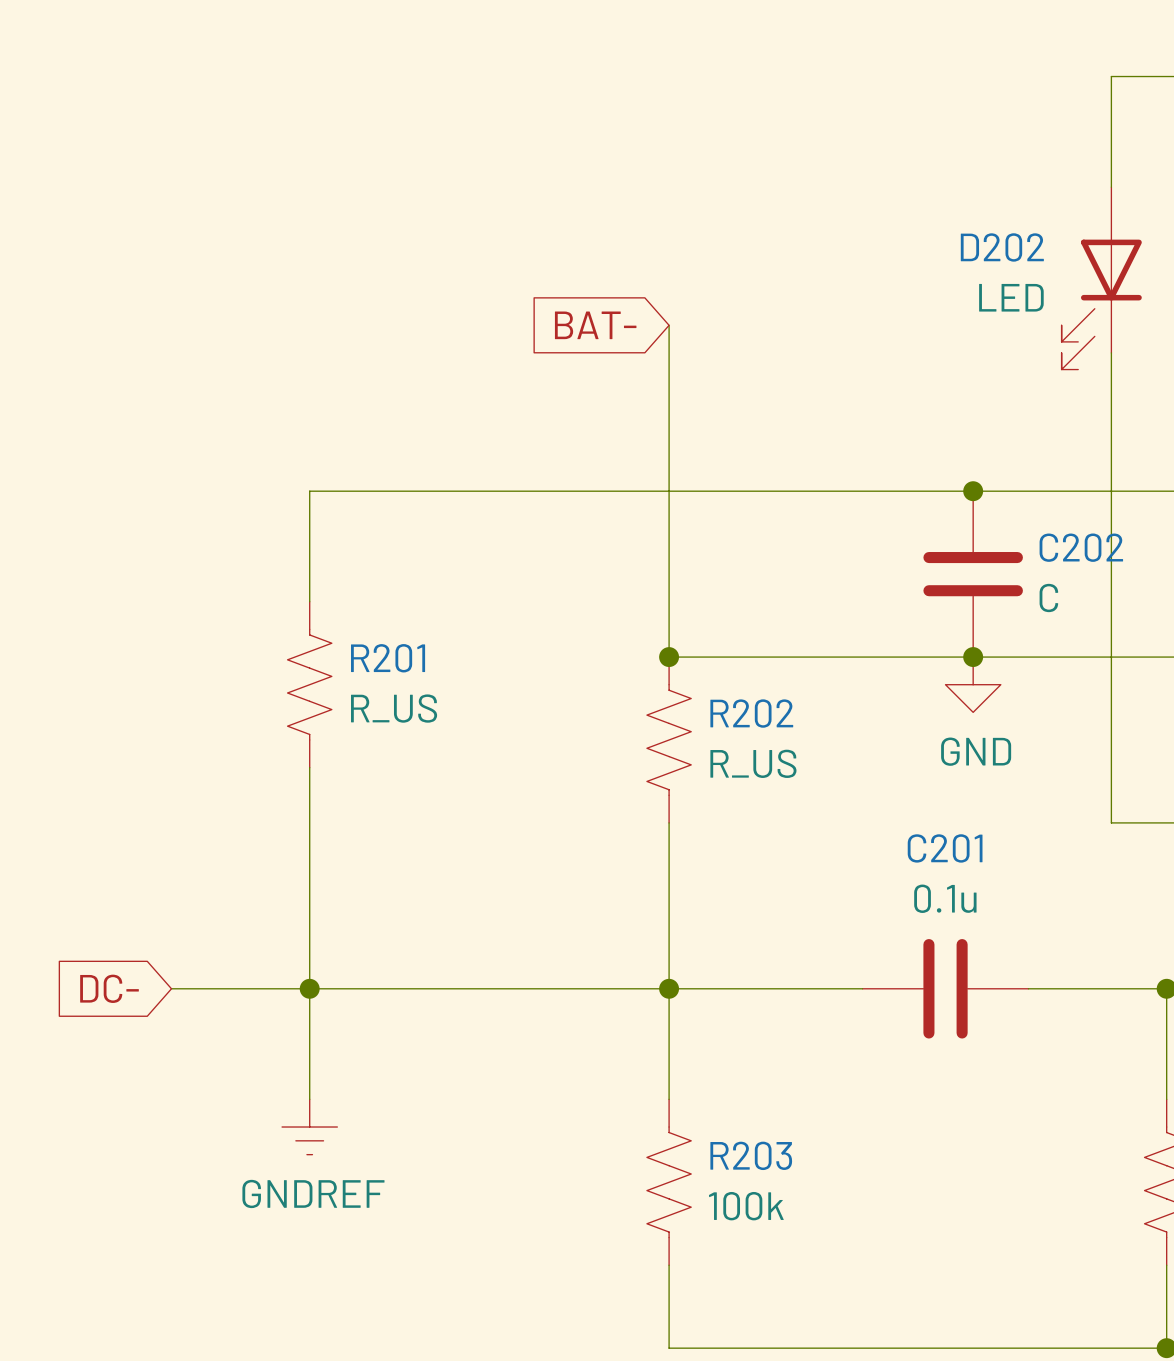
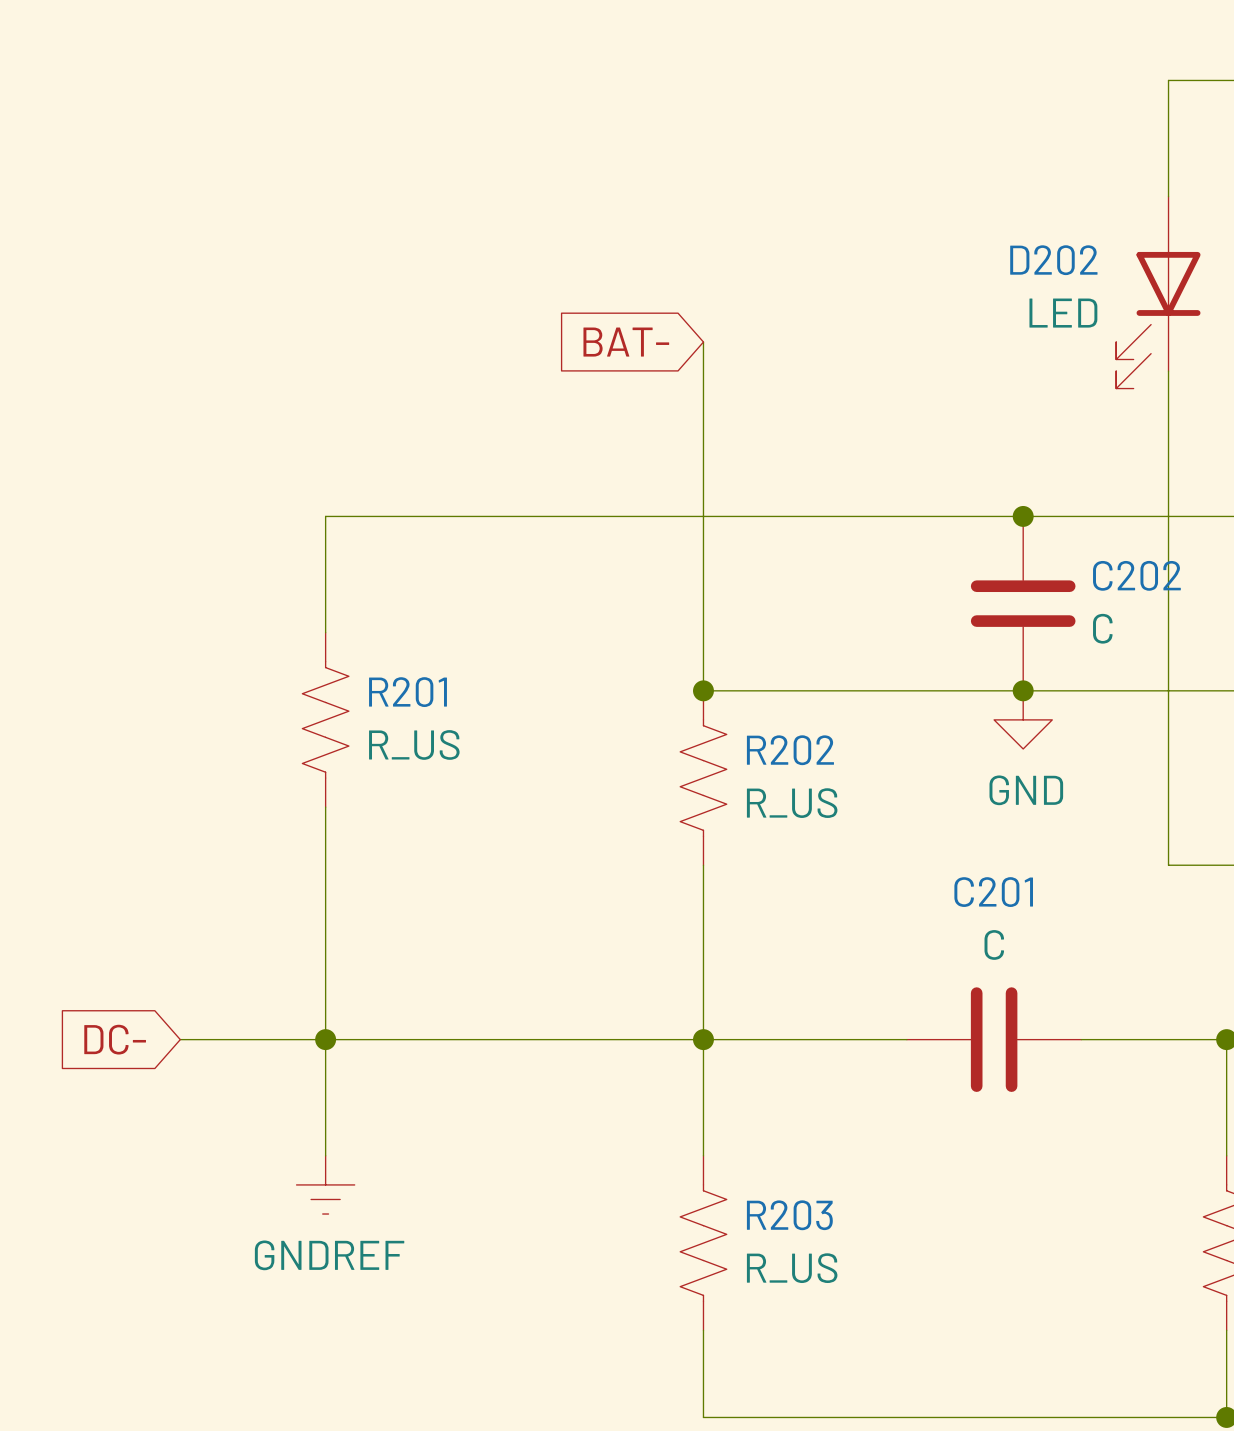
C201 value: 0.1u (945, 898) -> C (994, 944)
R203 value: 100k (746, 1206) -> R_US (792, 1268)

